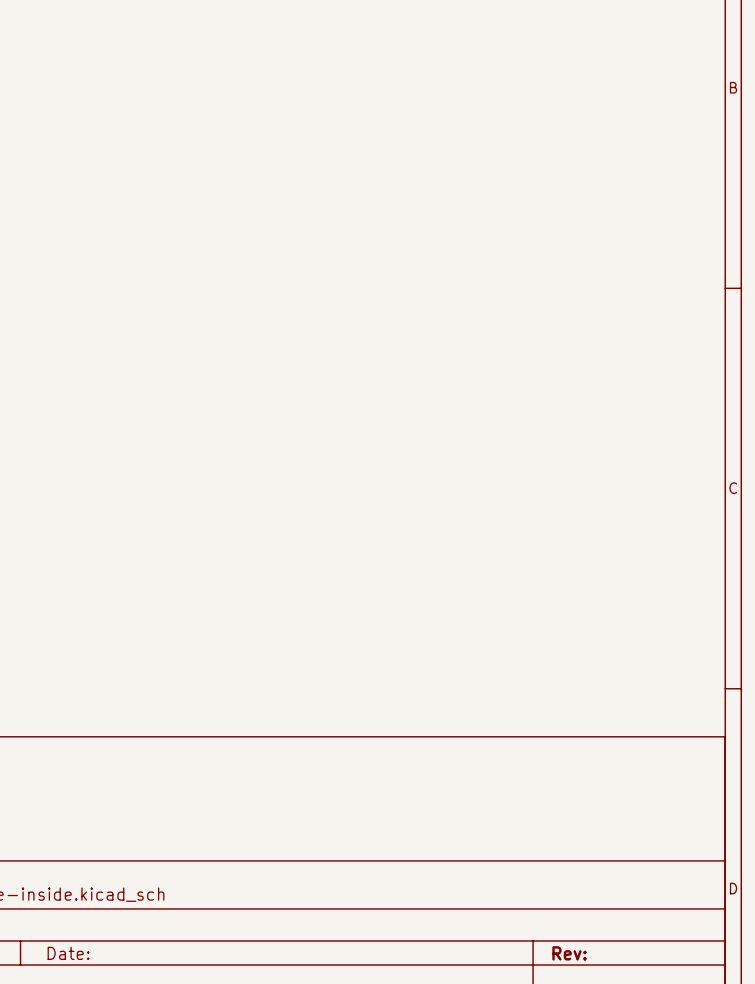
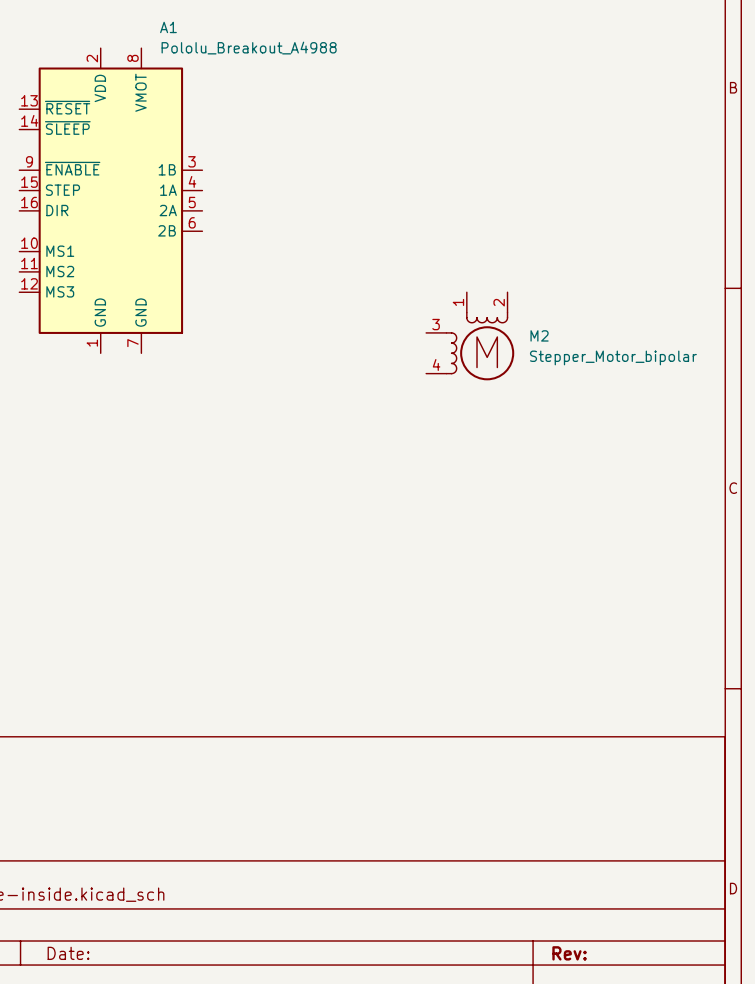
A1: none -> Pololu_Breakout_A4988 (110, 200)
M2: none -> Stepper_Motor_bipolar (470, 336)

